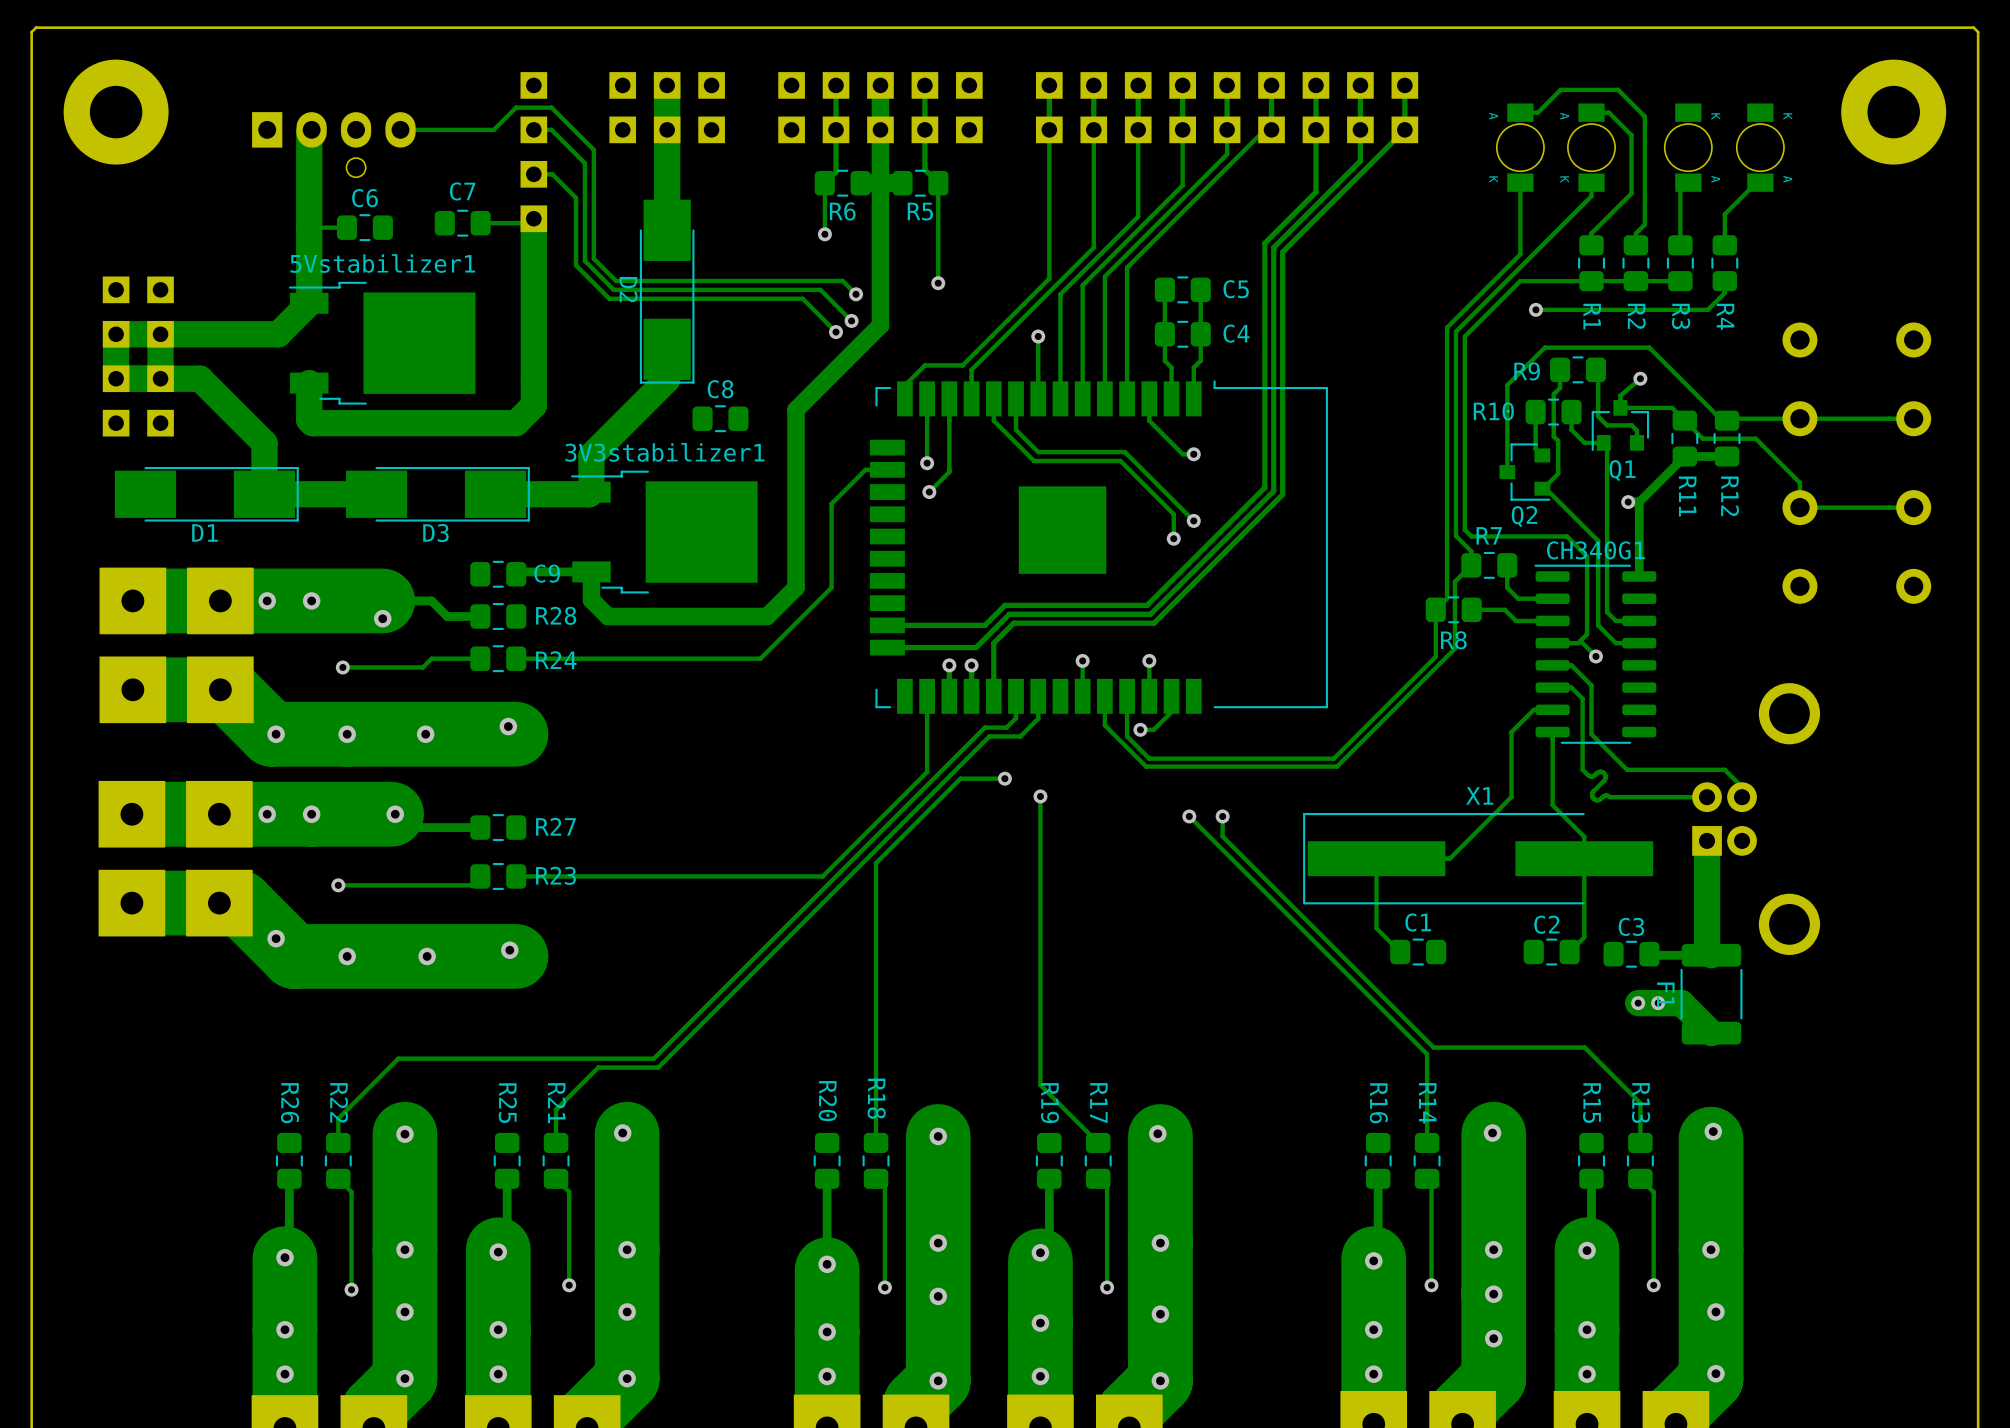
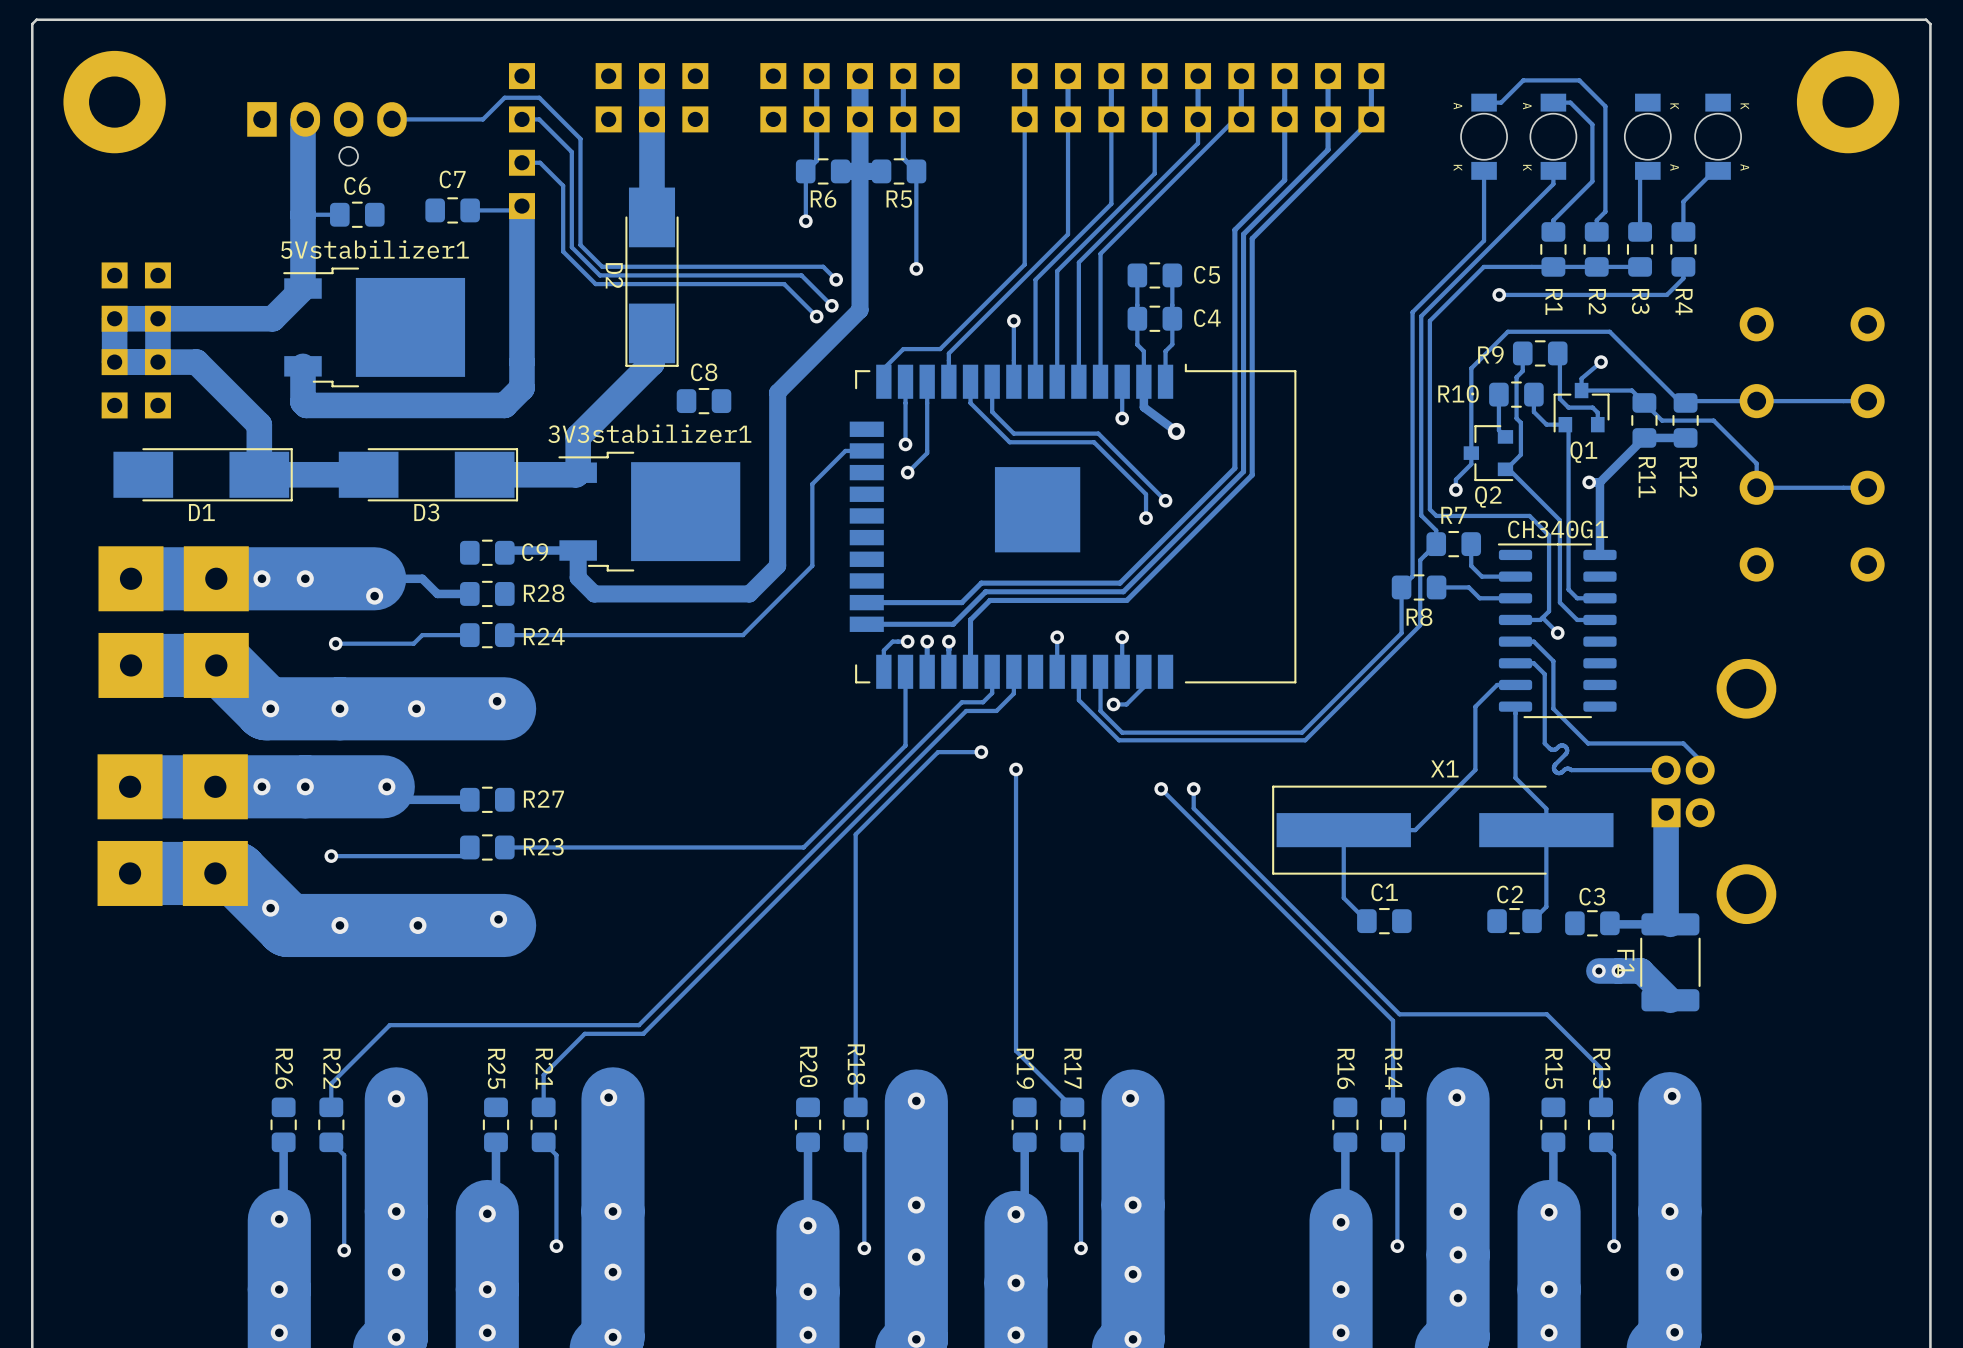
track: none -> (1143, 381) (1143, 407) (1176, 431)
track: (1149, 420) (1182, 454) (1193, 454) -> (1122, 403) (1122, 418)
via: none -> (1176, 431)
via position: (1193, 454) -> (1122, 418)
track: none -> (1471, 453) (1471, 464) (1455, 479) (1455, 489)
via: none -> (1455, 489)
track: none -> (907, 641) (892, 641) (883, 650) (883, 671)
via: none -> (907, 641)

